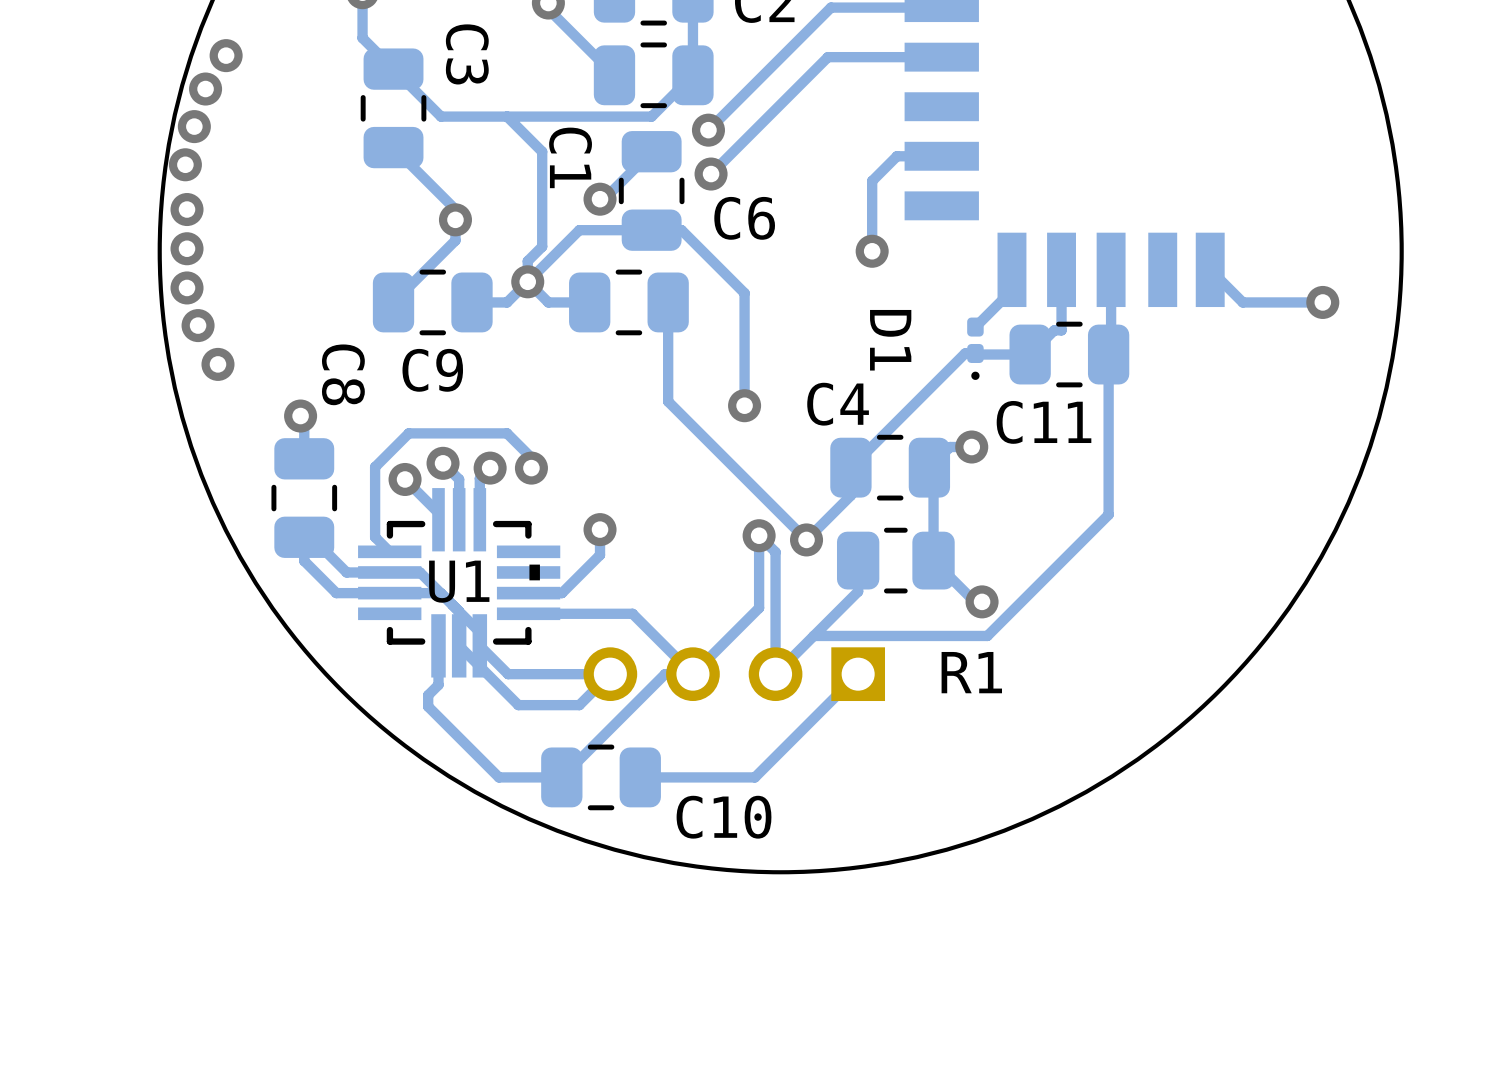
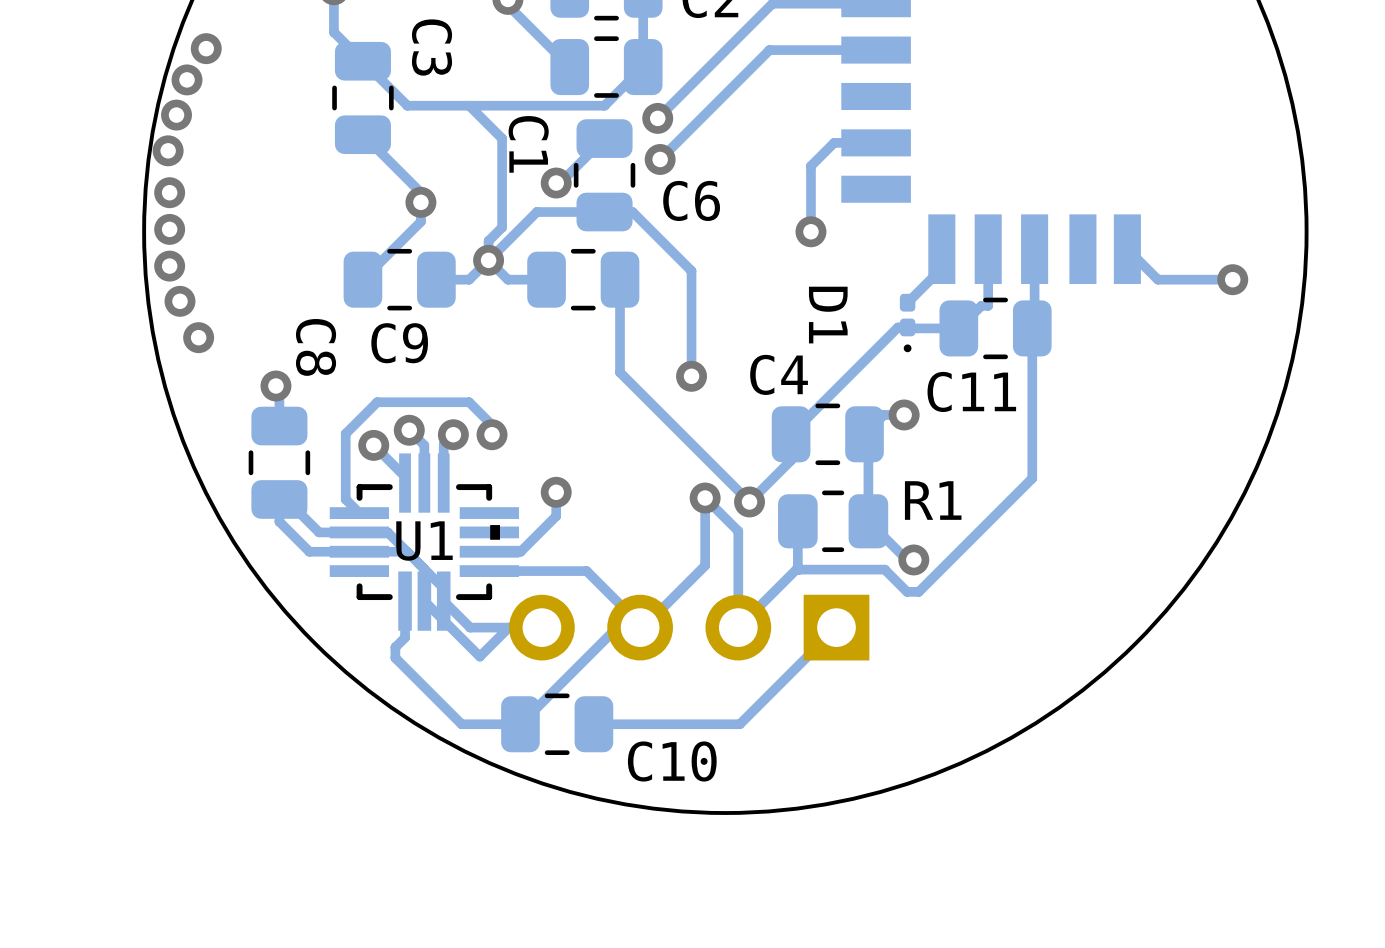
track: (775, 552) (775, 674) (858, 591) -> (799, 569) (797, 550)
track: (974, 635) (813, 635) -> (907, 591) (884, 569) (796, 569) (738, 627) (738, 531) (720, 513)
part footprint: [583, 647, 886, 702] -> [509, 594, 870, 661]
R1 name position: R1 (971, 672) -> R1 (933, 500)
track: (584, 674) (610, 674) (579, 705) (518, 705) -> (508, 627) (479, 656)
track: (858, 674) (754, 777) -> (836, 627) (739, 724) (701, 724)

